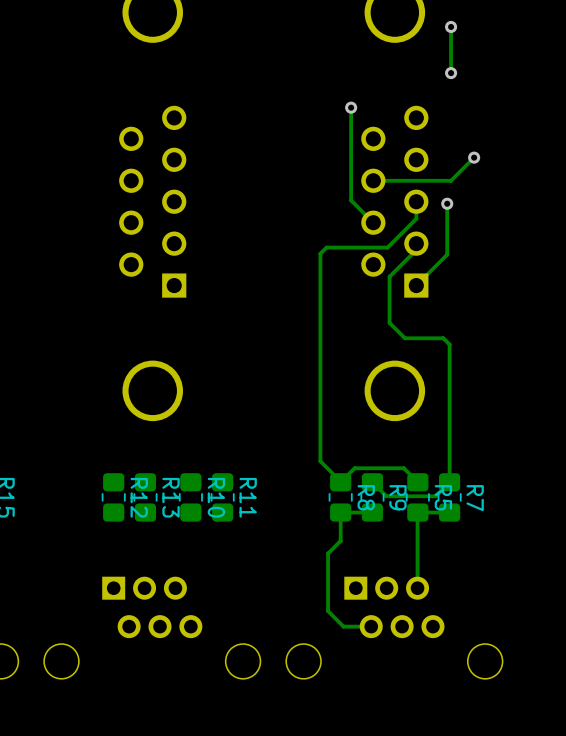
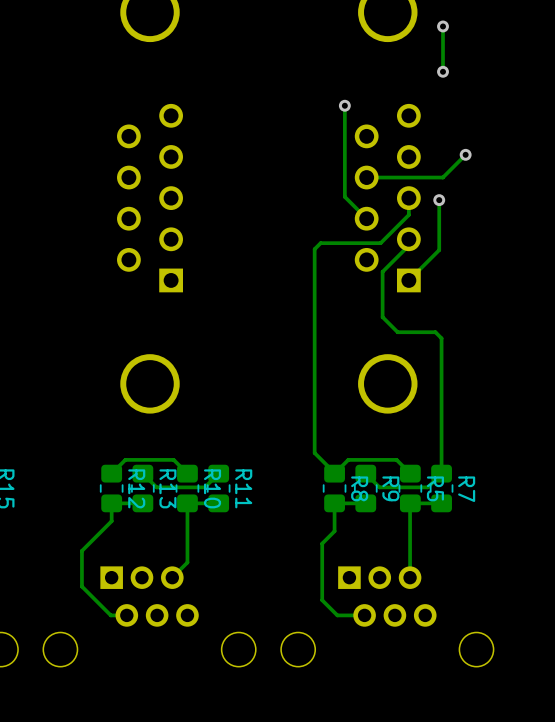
track: none -> (187, 473) (173, 459) (125, 459) (111, 473)
track: none -> (218, 473) (204, 487) (156, 487) (142, 473)
track: none -> (142, 503) (111, 503) (111, 521) (81, 550) (81, 586) (110, 615) (126, 615)
track: none -> (218, 503) (187, 503) (187, 562) (172, 577)

